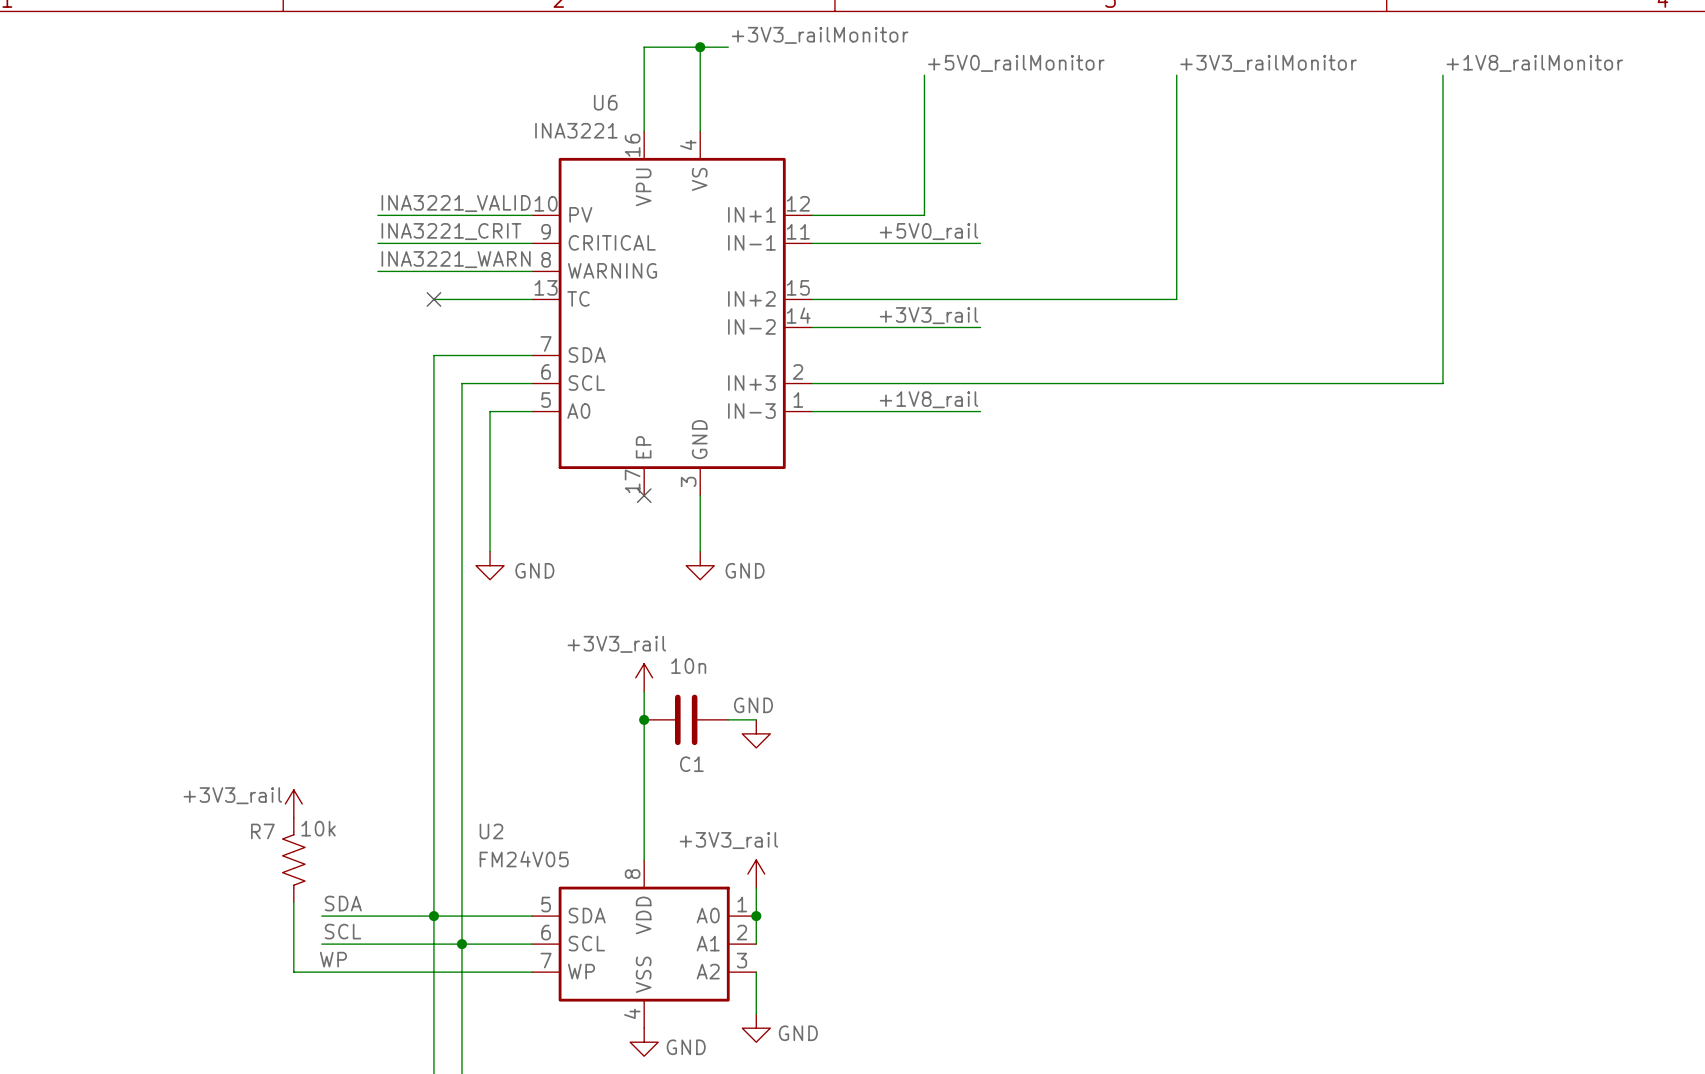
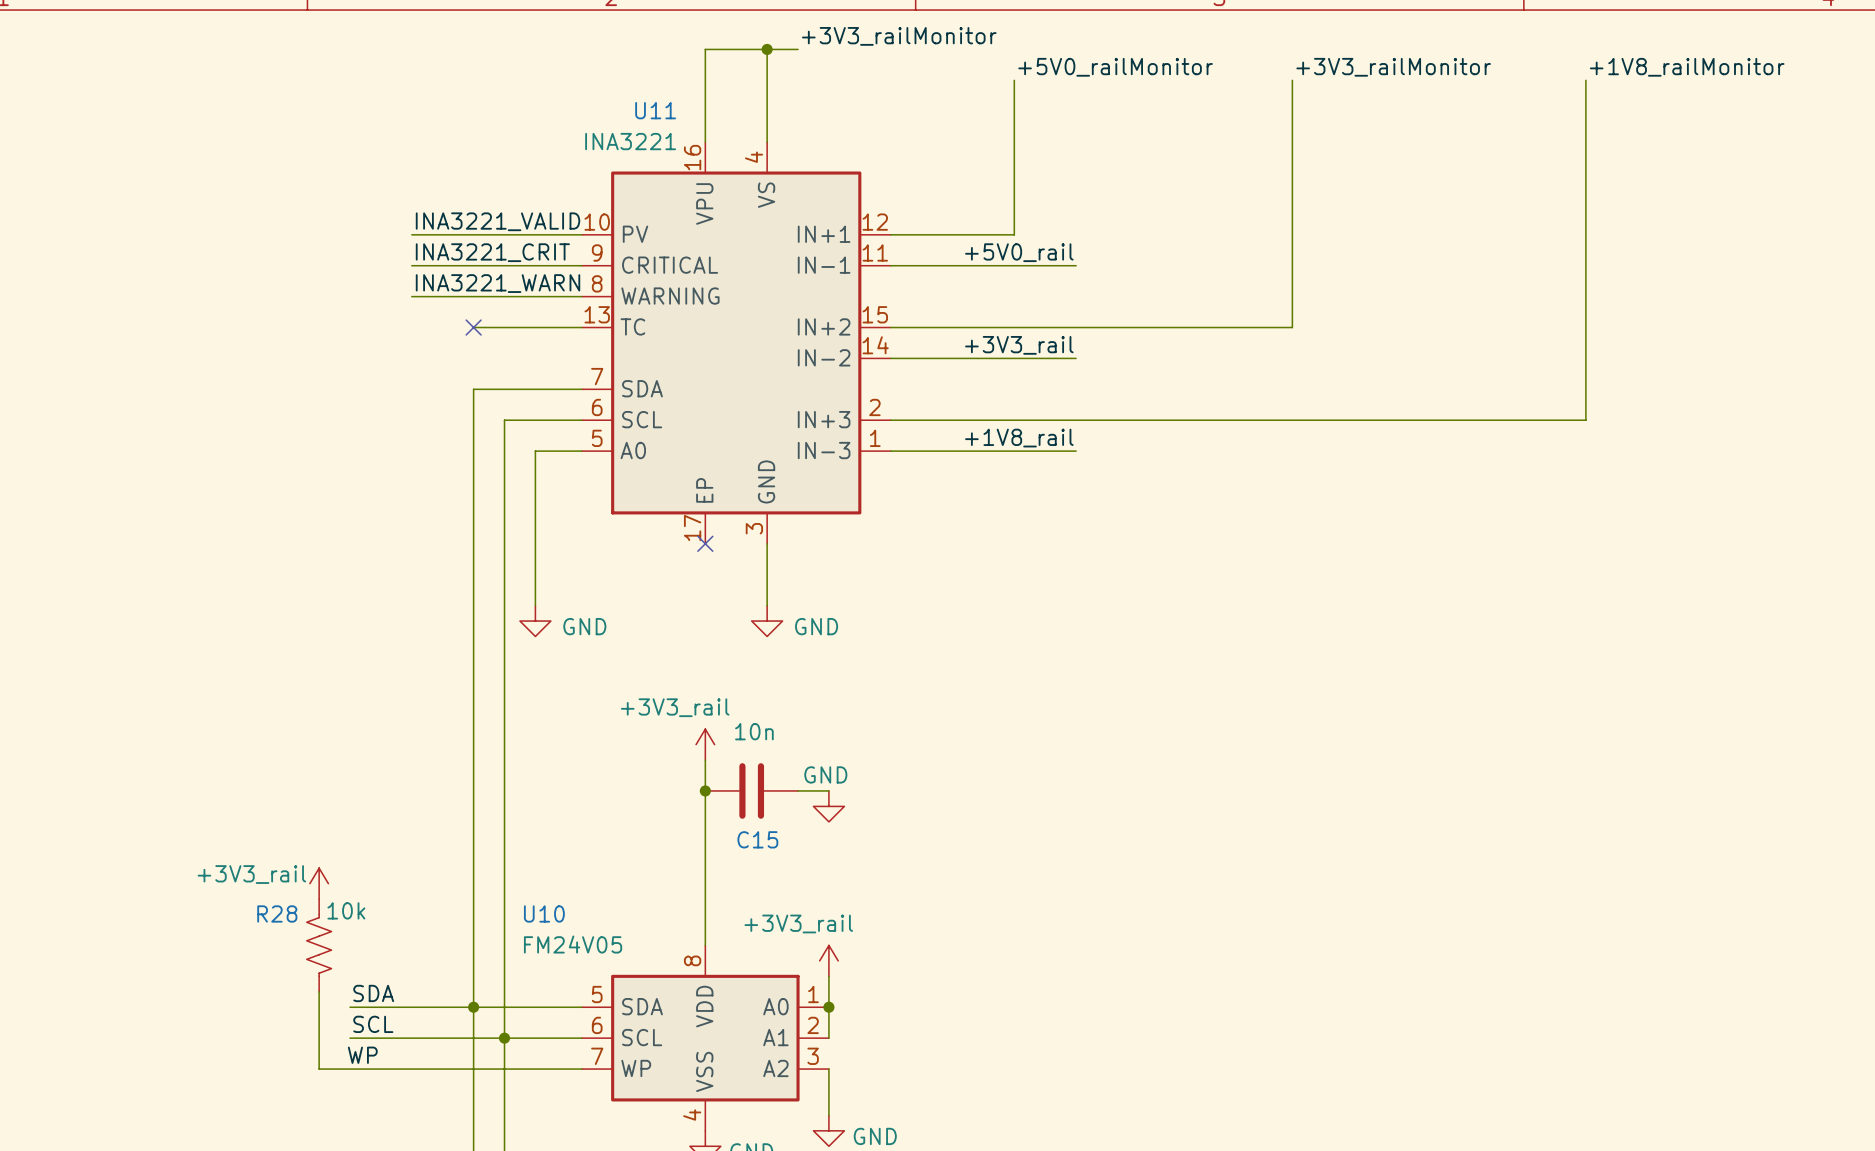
U6 name: U6 (605, 102) -> U11 (655, 110)
C1 name: C1 (691, 764) -> C15 (757, 839)
R7 name: R7 (262, 831) -> R28 (277, 913)
U2 name: U2 (491, 831) -> U10 (544, 913)

